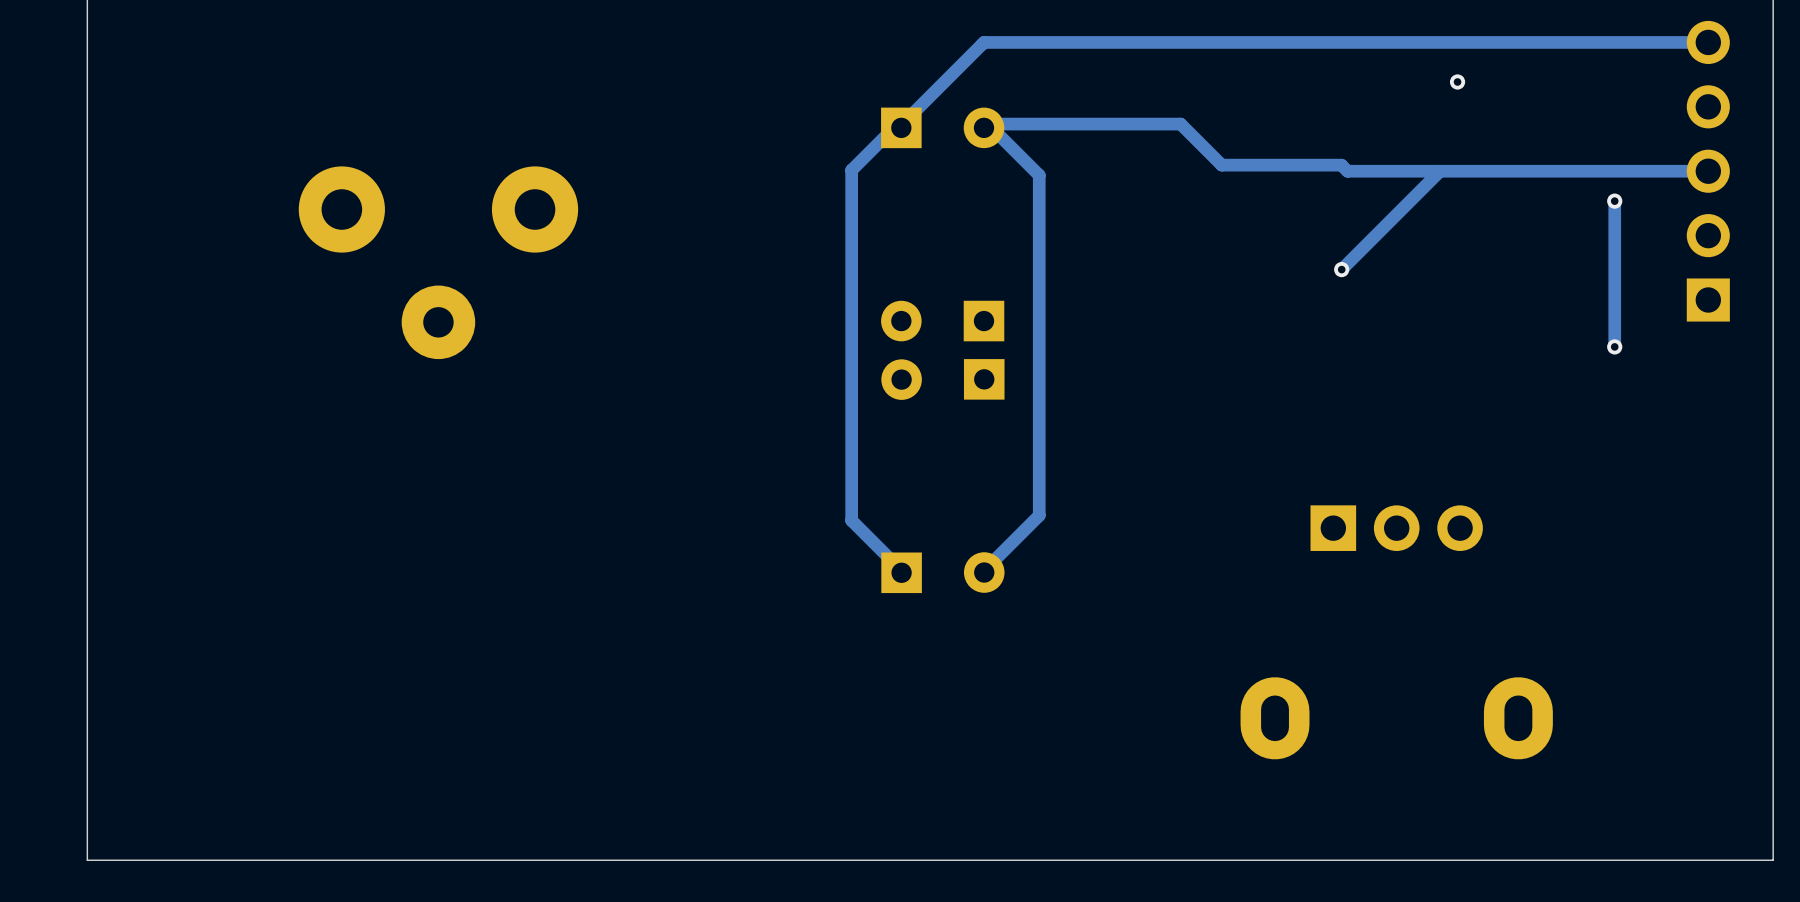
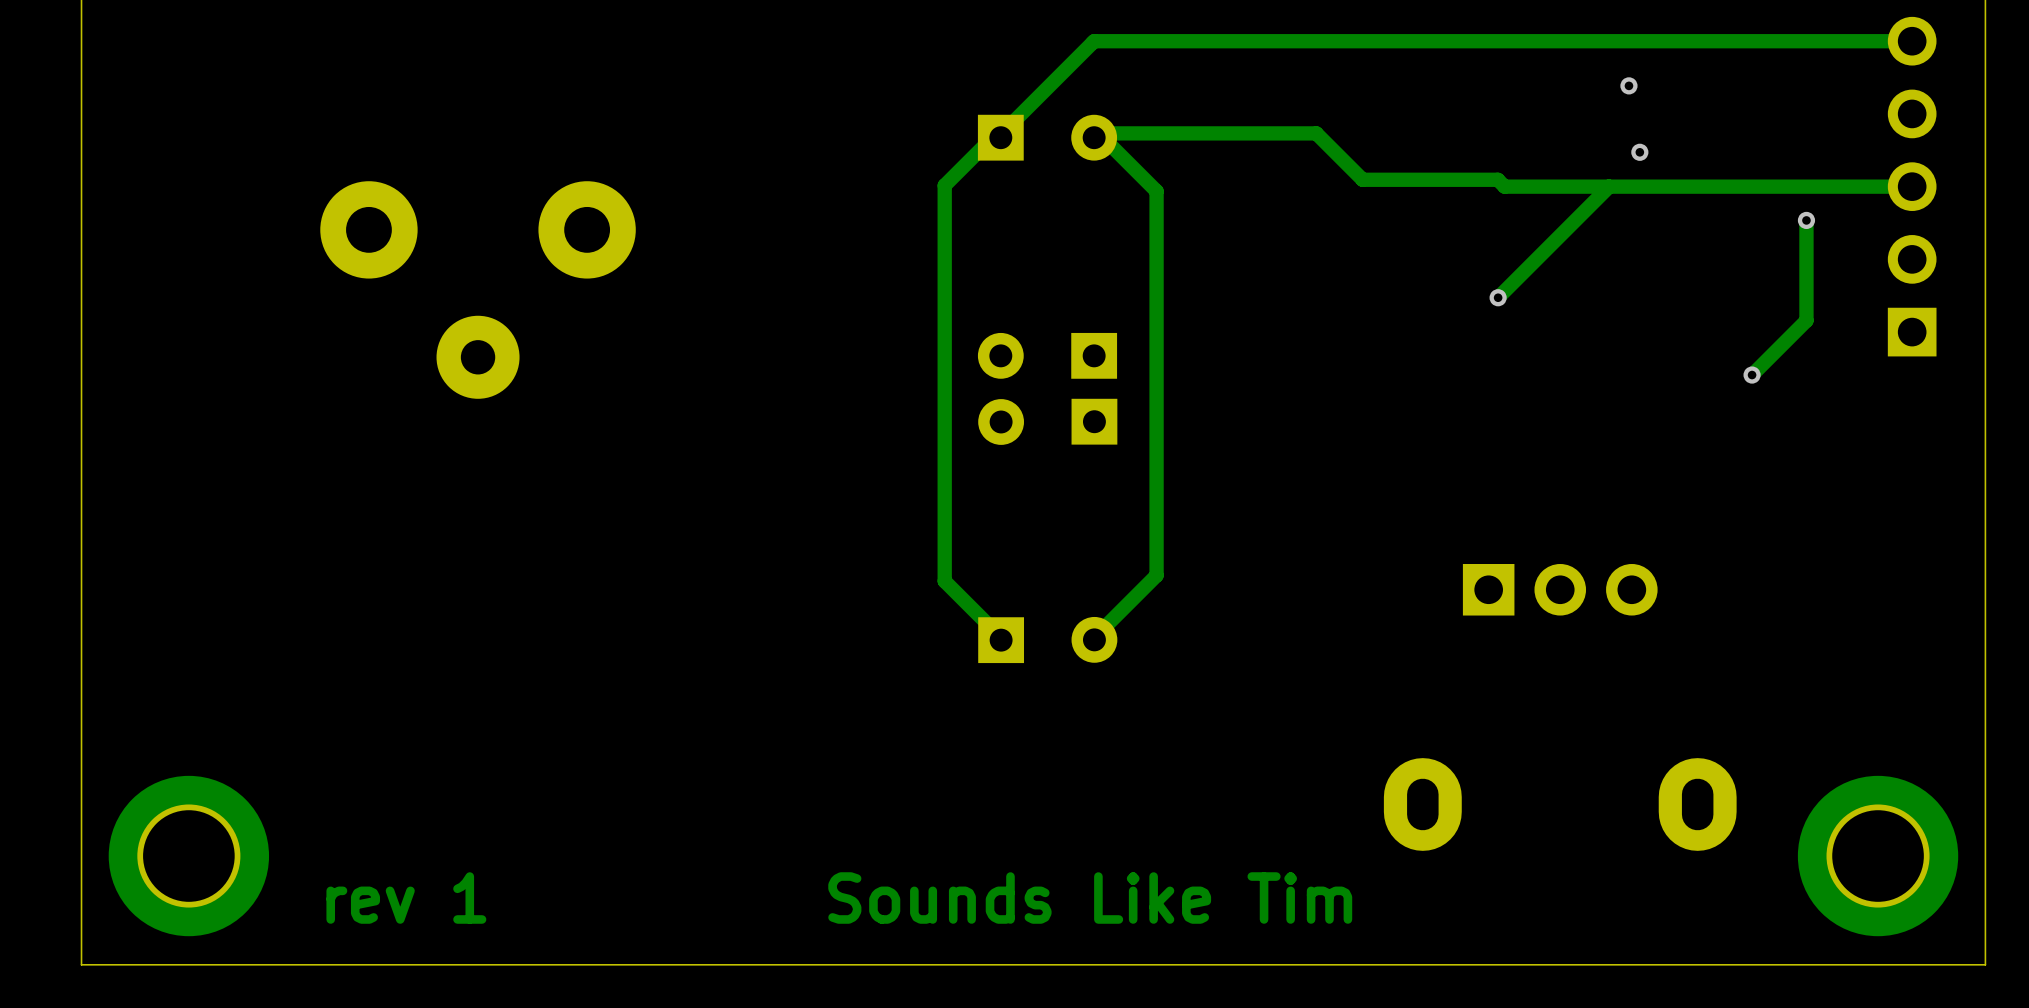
via: none -> (1639, 152)
track: (1614, 289) (1614, 346) -> (1806, 320) (1752, 375)
via position: (1614, 346) -> (1752, 375)
part: none -> (188, 856)
part: none -> (1878, 856)
text: none -> rev 1 (406, 898)
text: none -> Sounds Like Tim (1090, 898)

